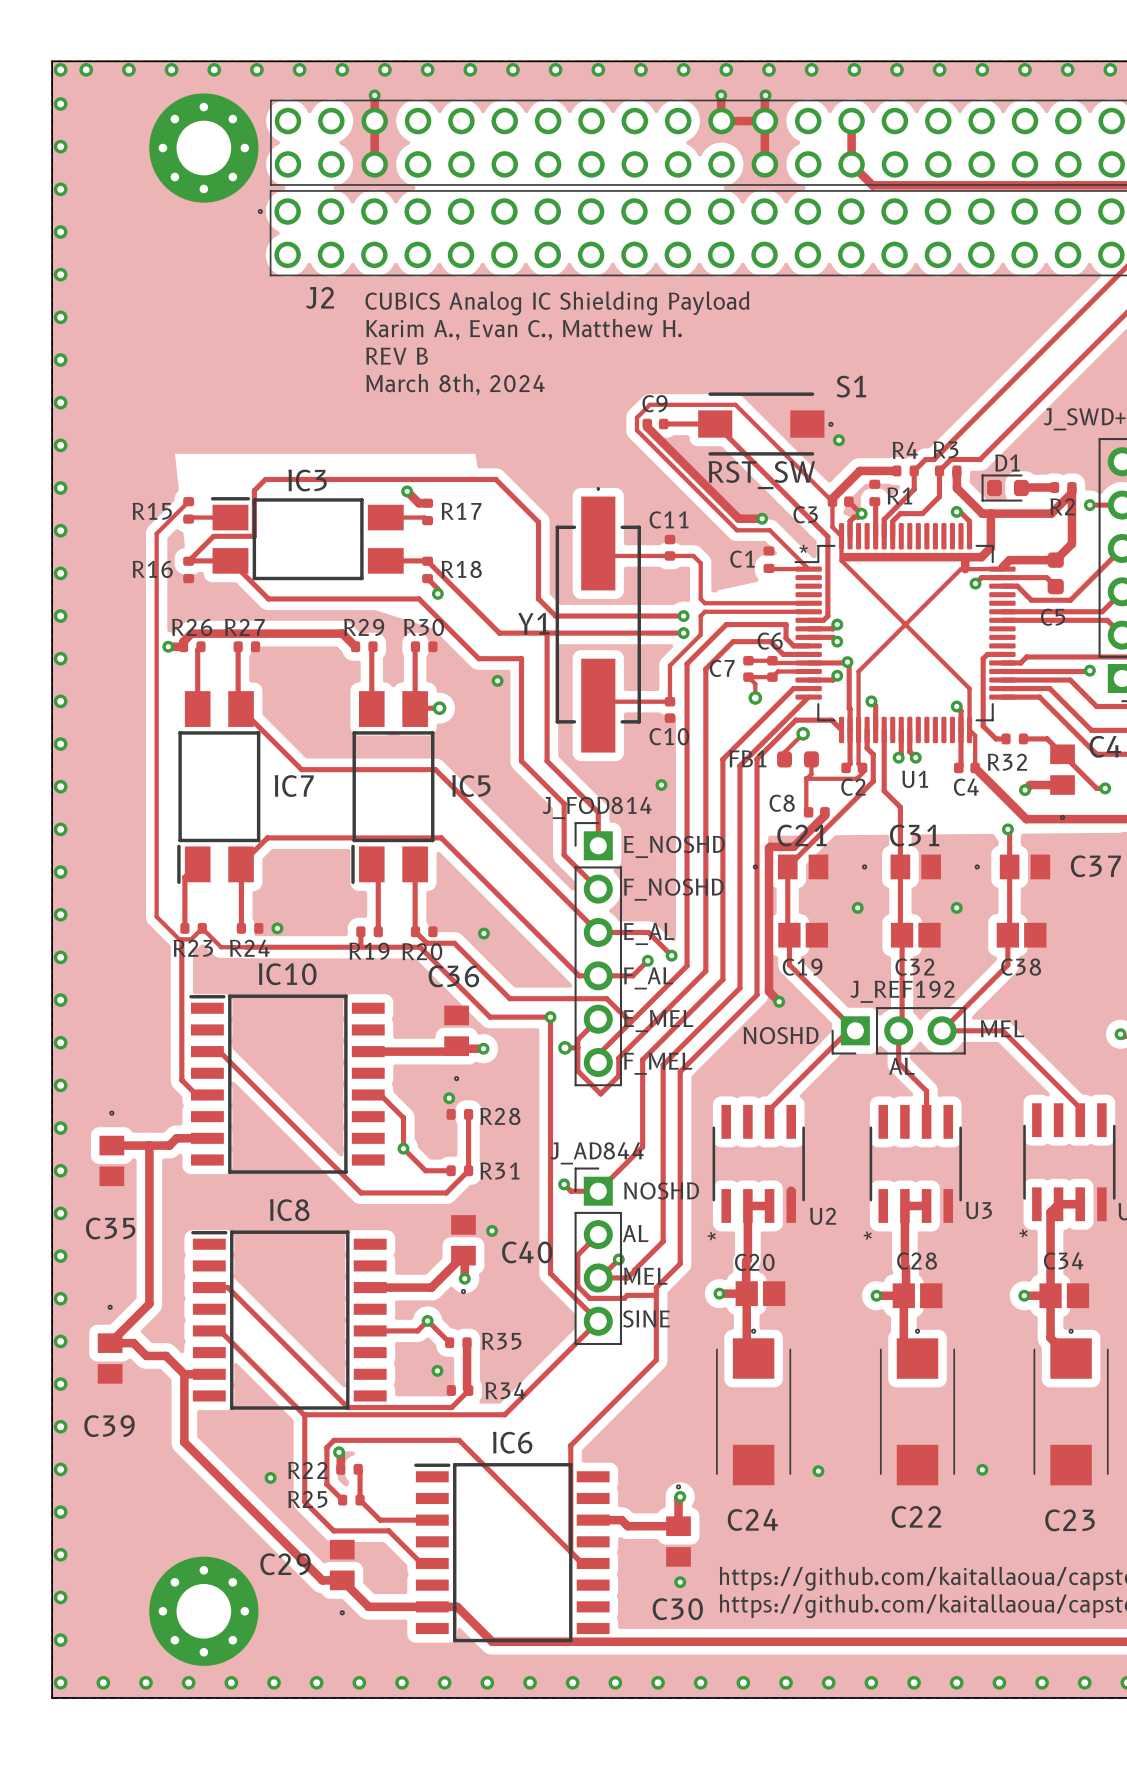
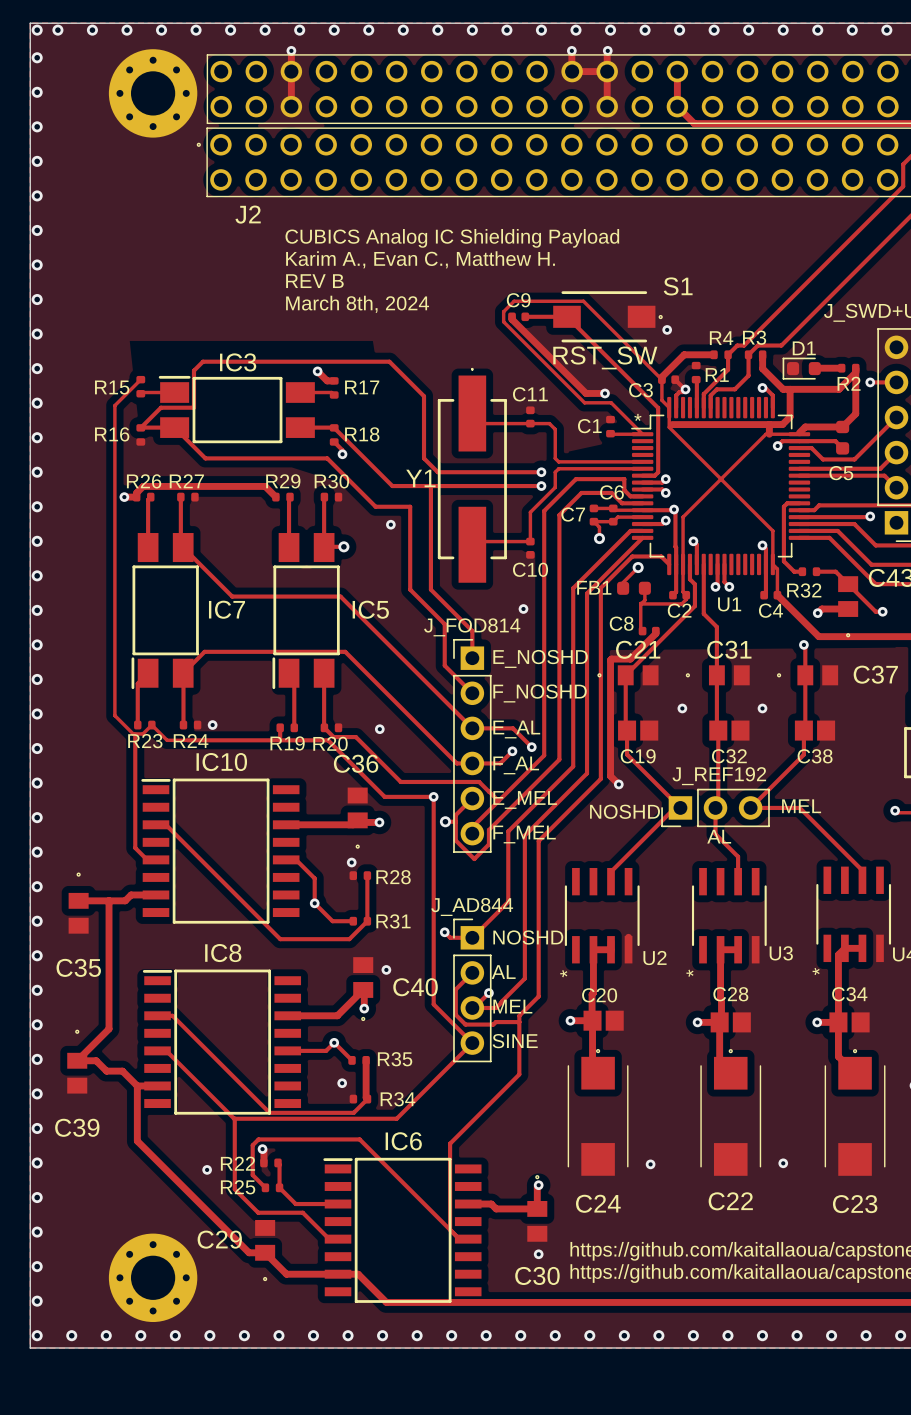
text: CUBICS Analog IC Shielding Payload (557, 303) -> none
text: Karim A., Evan C., Matthew H. (524, 329) -> CUBICS Analog IC Shielding Payload (452, 238)
text: REV B (397, 356) -> Karim A., Evan C., Matthew H. (420, 259)
text: March 8th, 2024 (455, 384) -> REV B (314, 281)
text: none -> March 8th, 2024 (357, 304)

